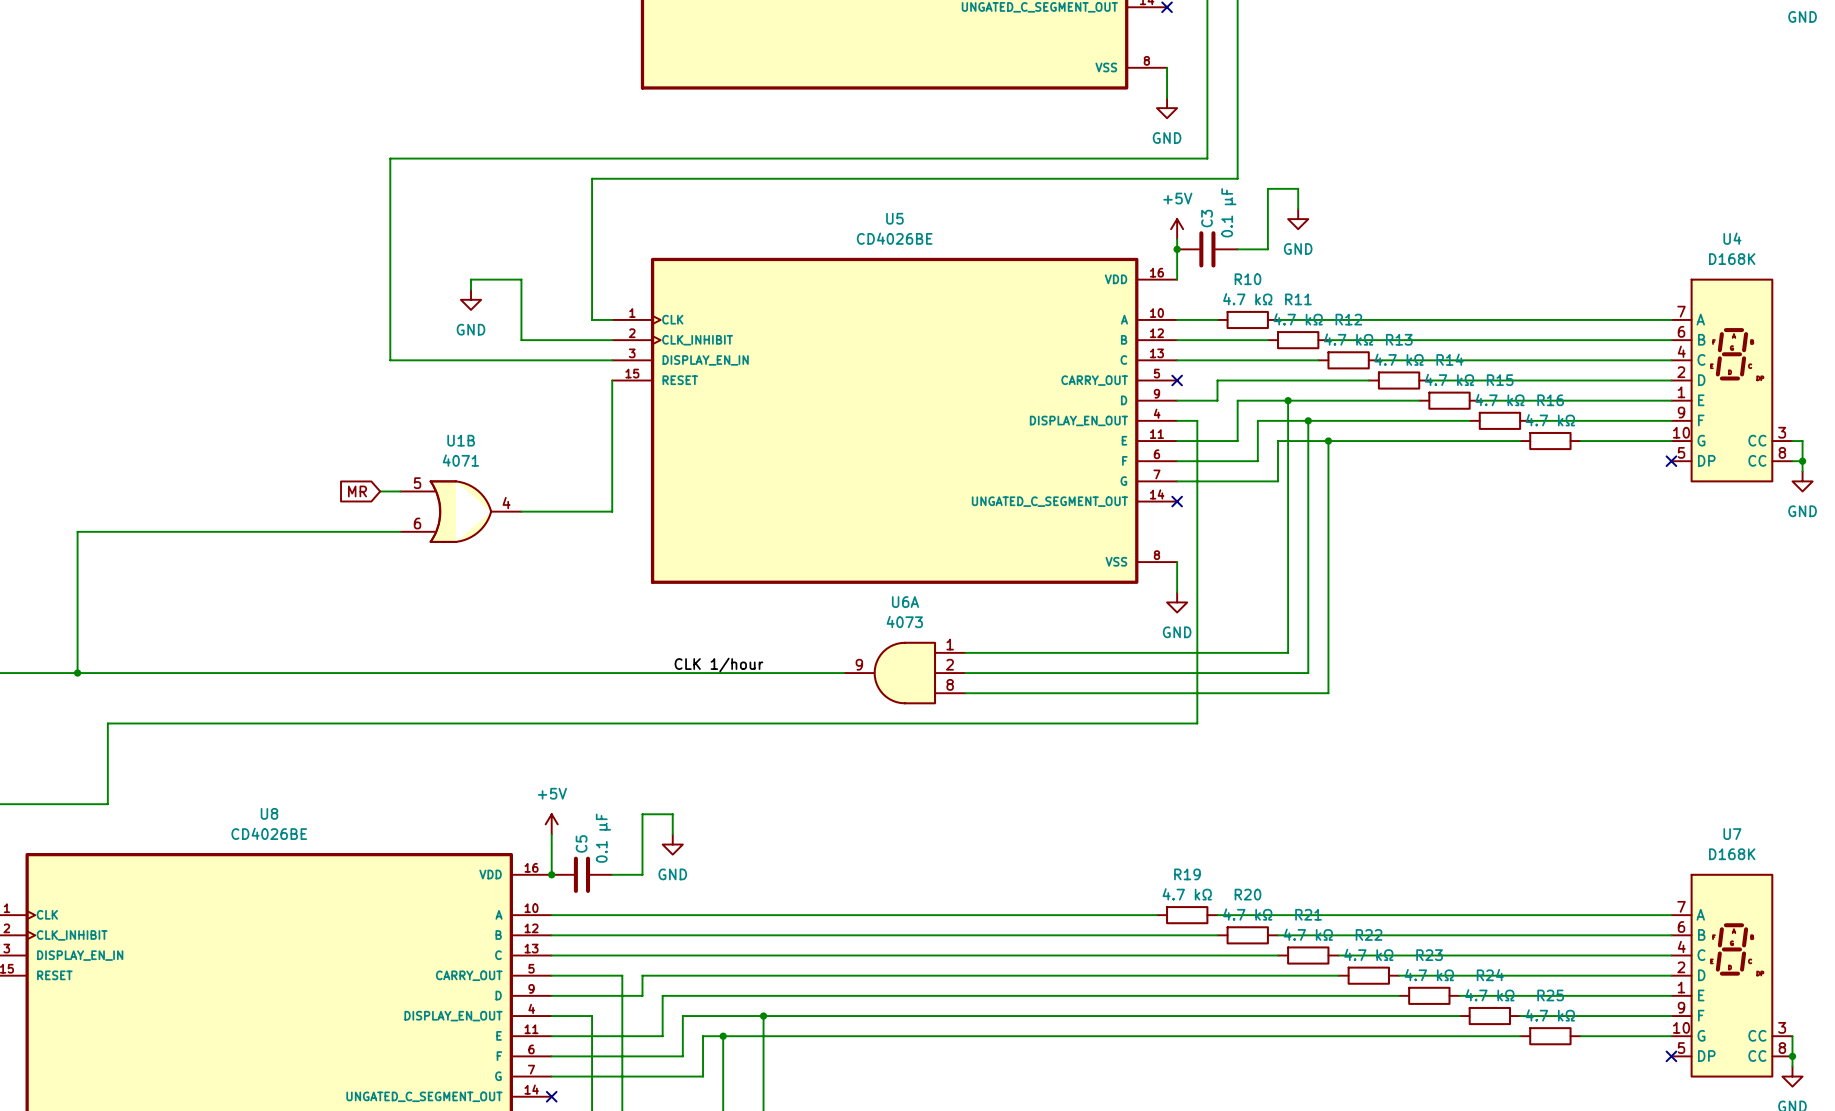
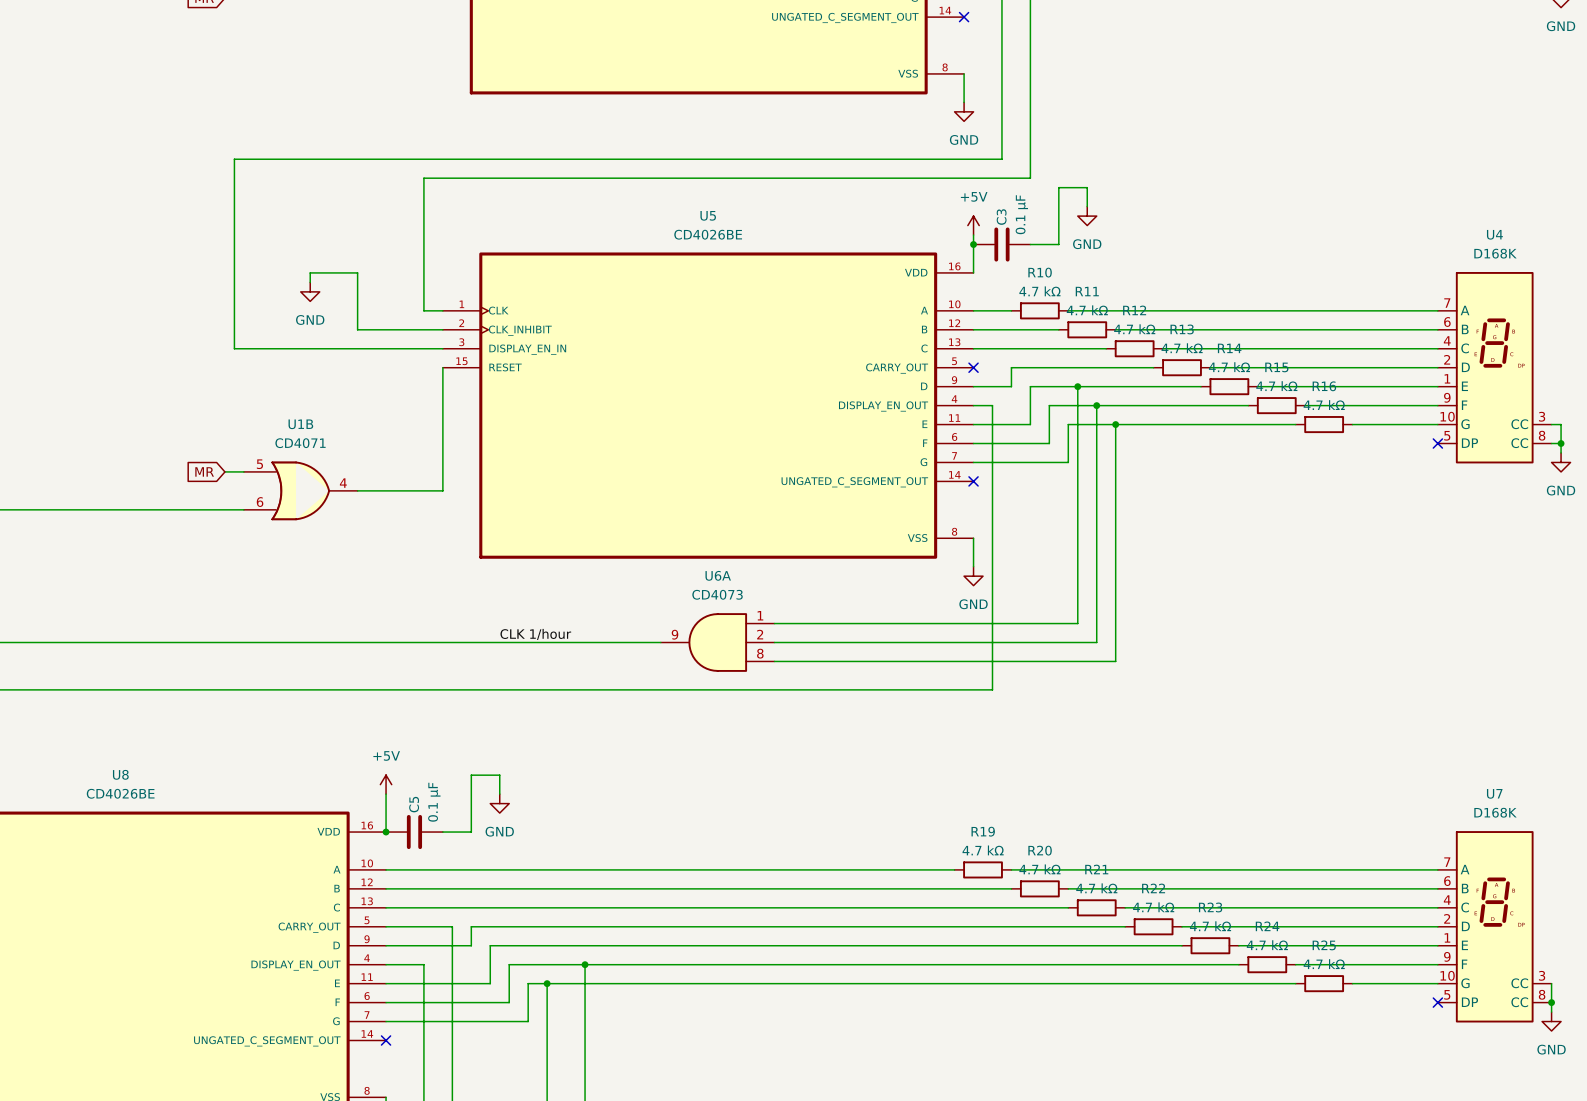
U1B value: 4071 (460, 460) -> CD4071 (300, 443)
U6A value: 4073 (904, 621) -> CD4073 (717, 594)

